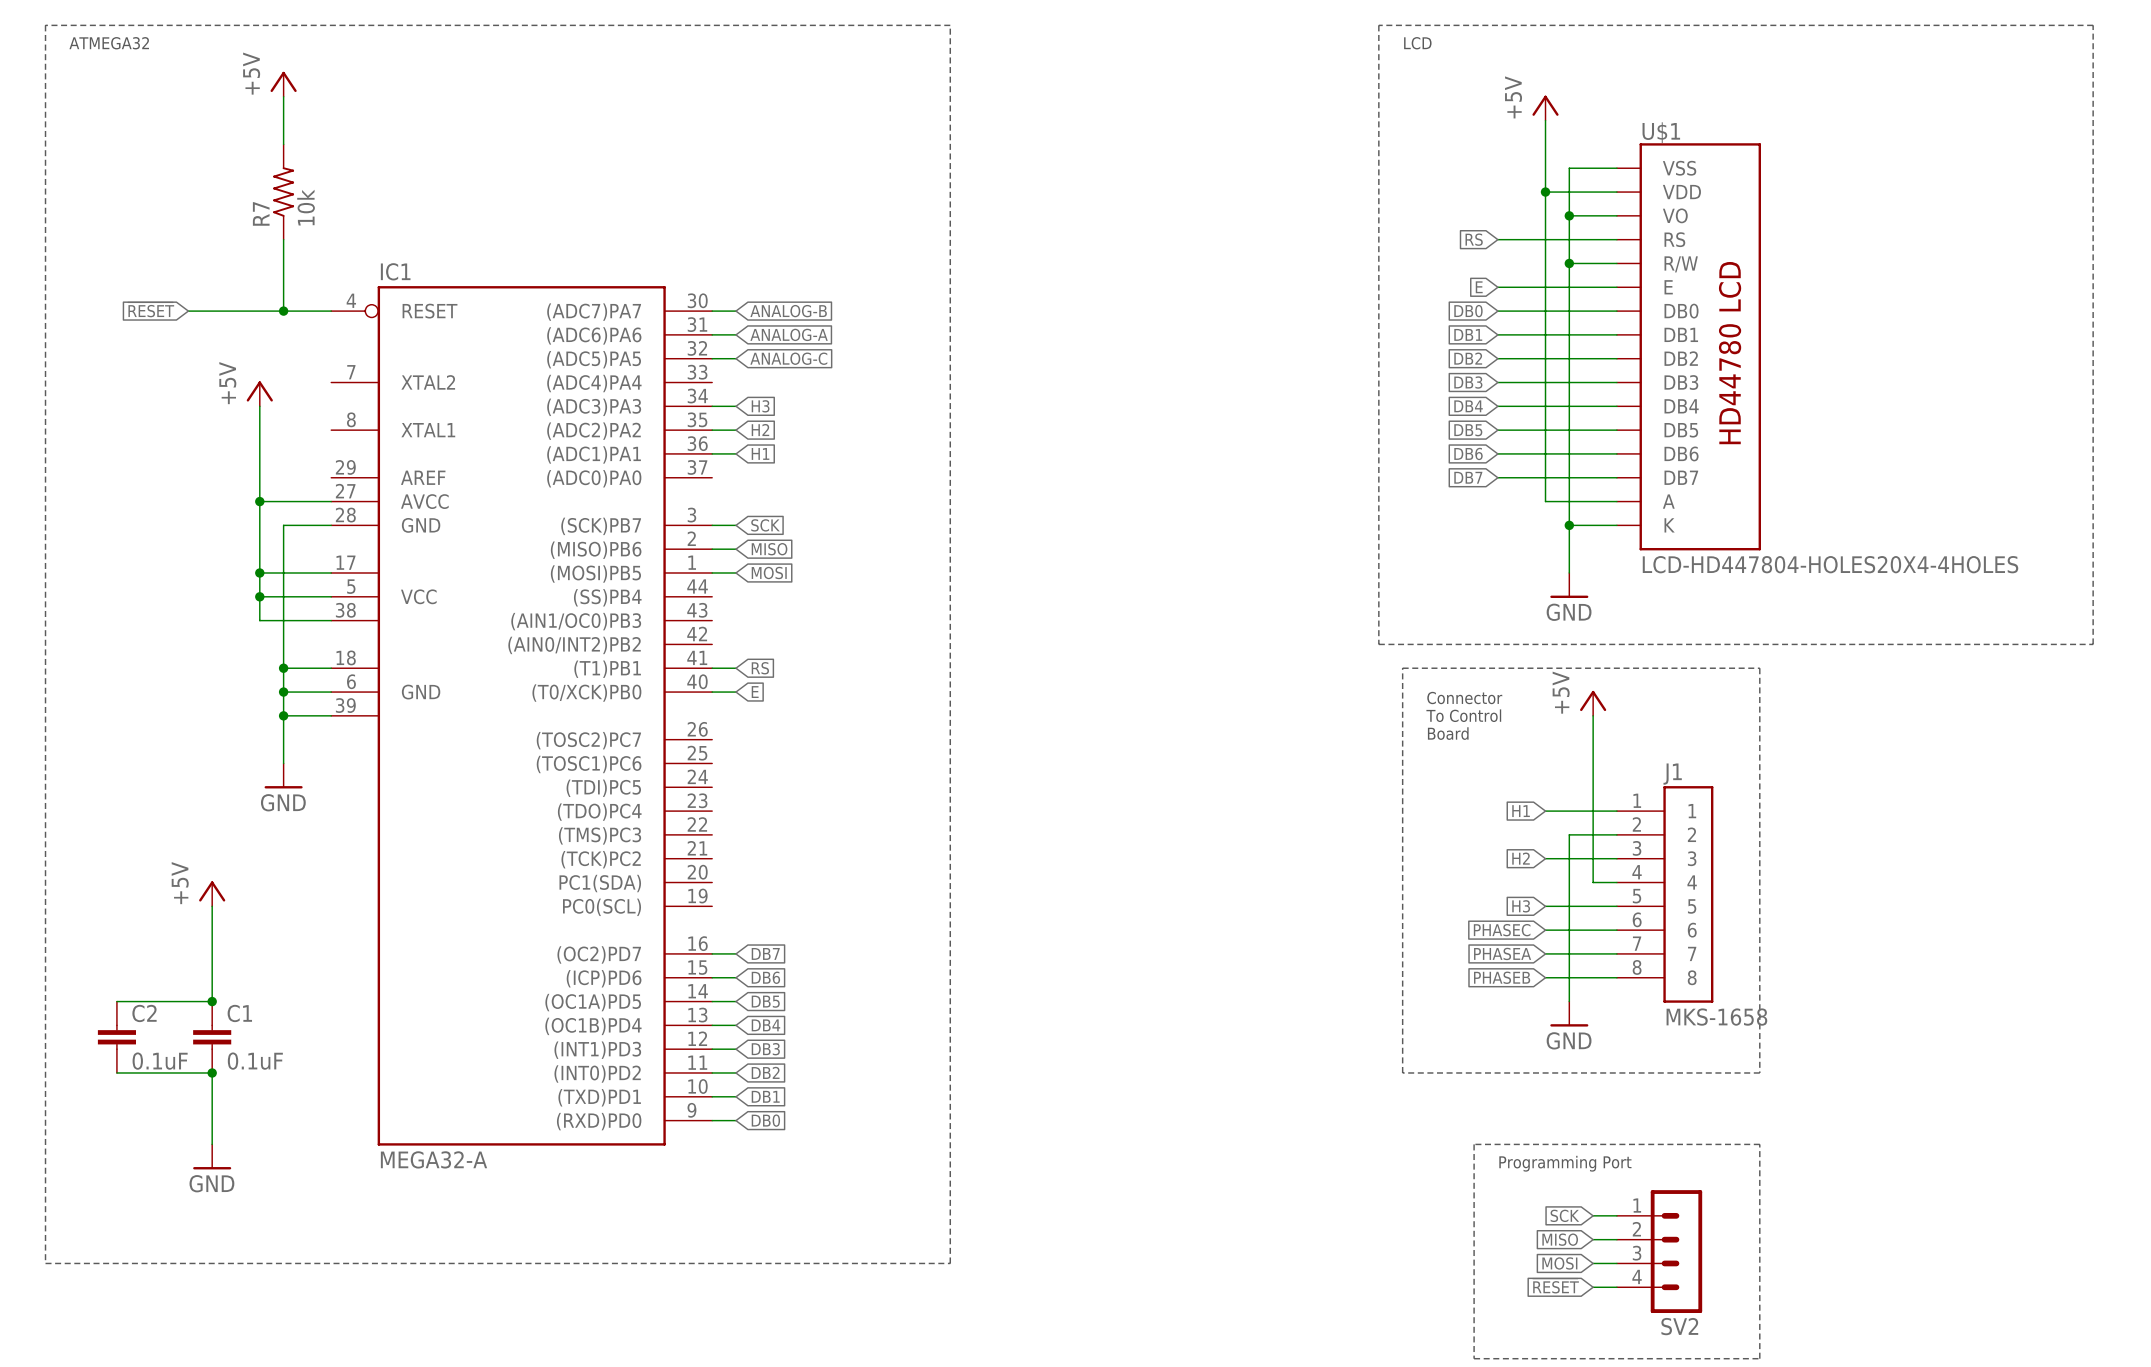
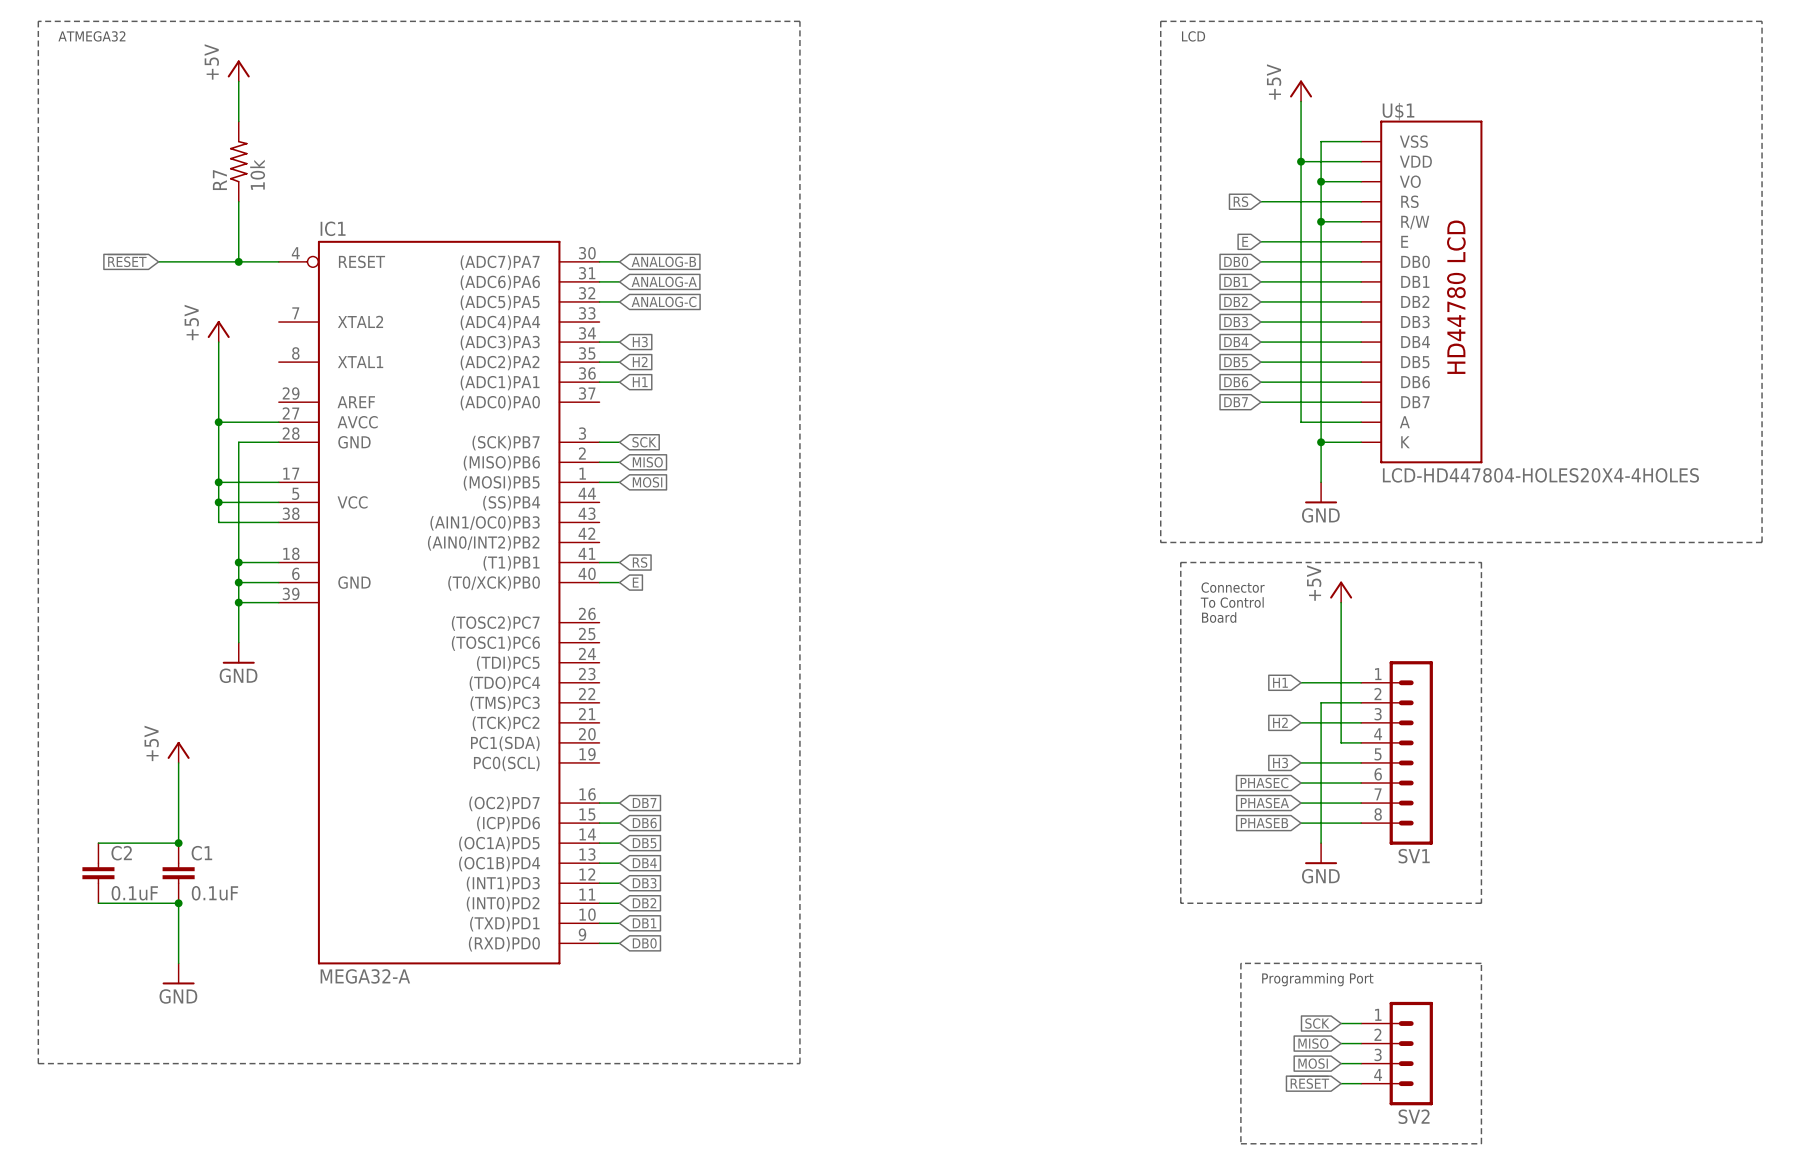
SV1: none -> (1397, 752)
J1: MKS-1658 (1665, 894) -> none

